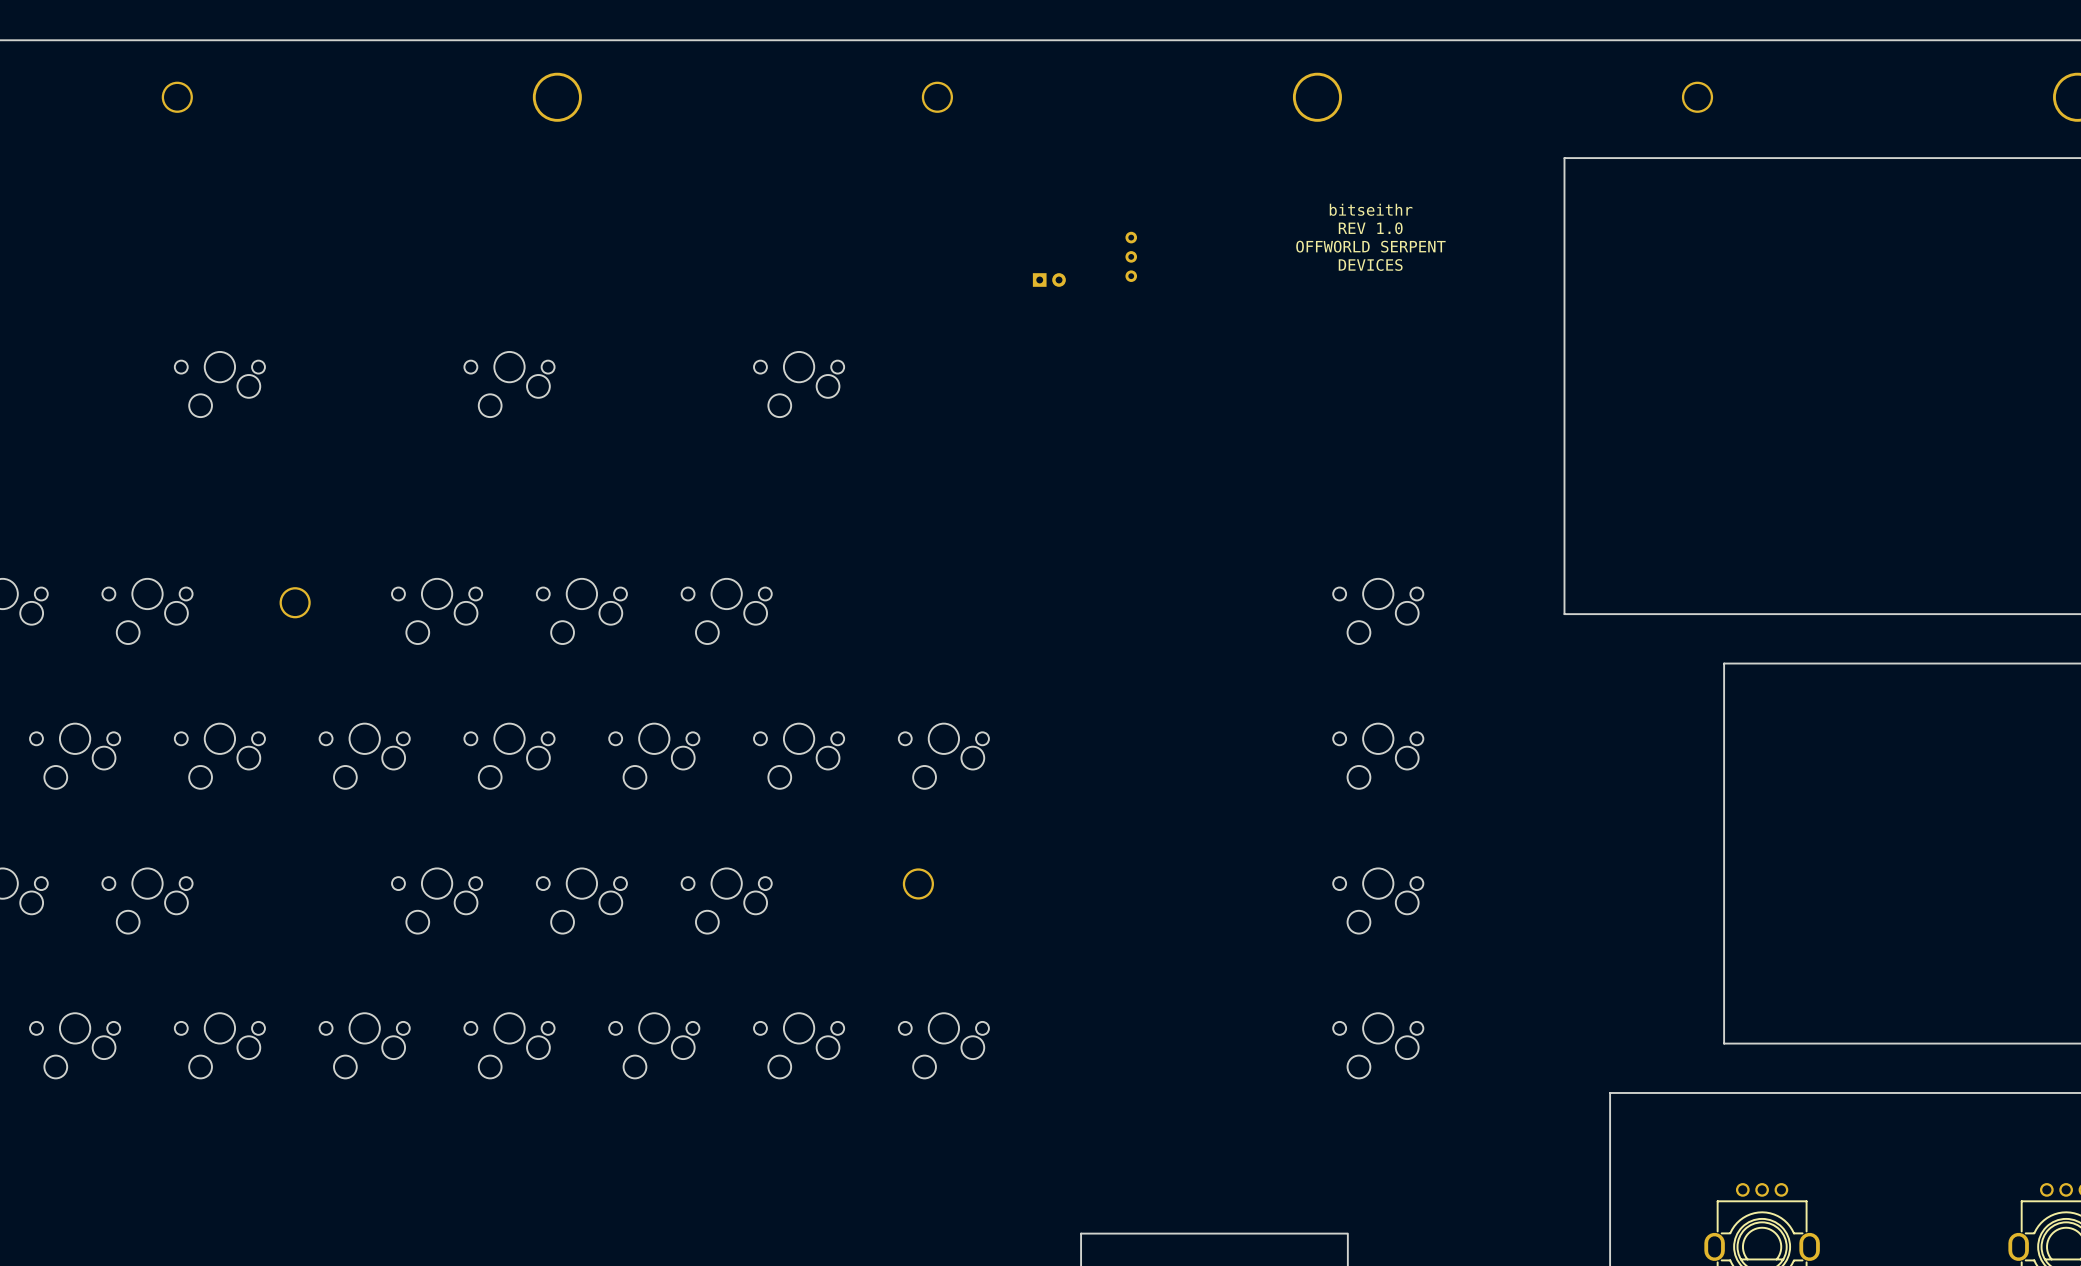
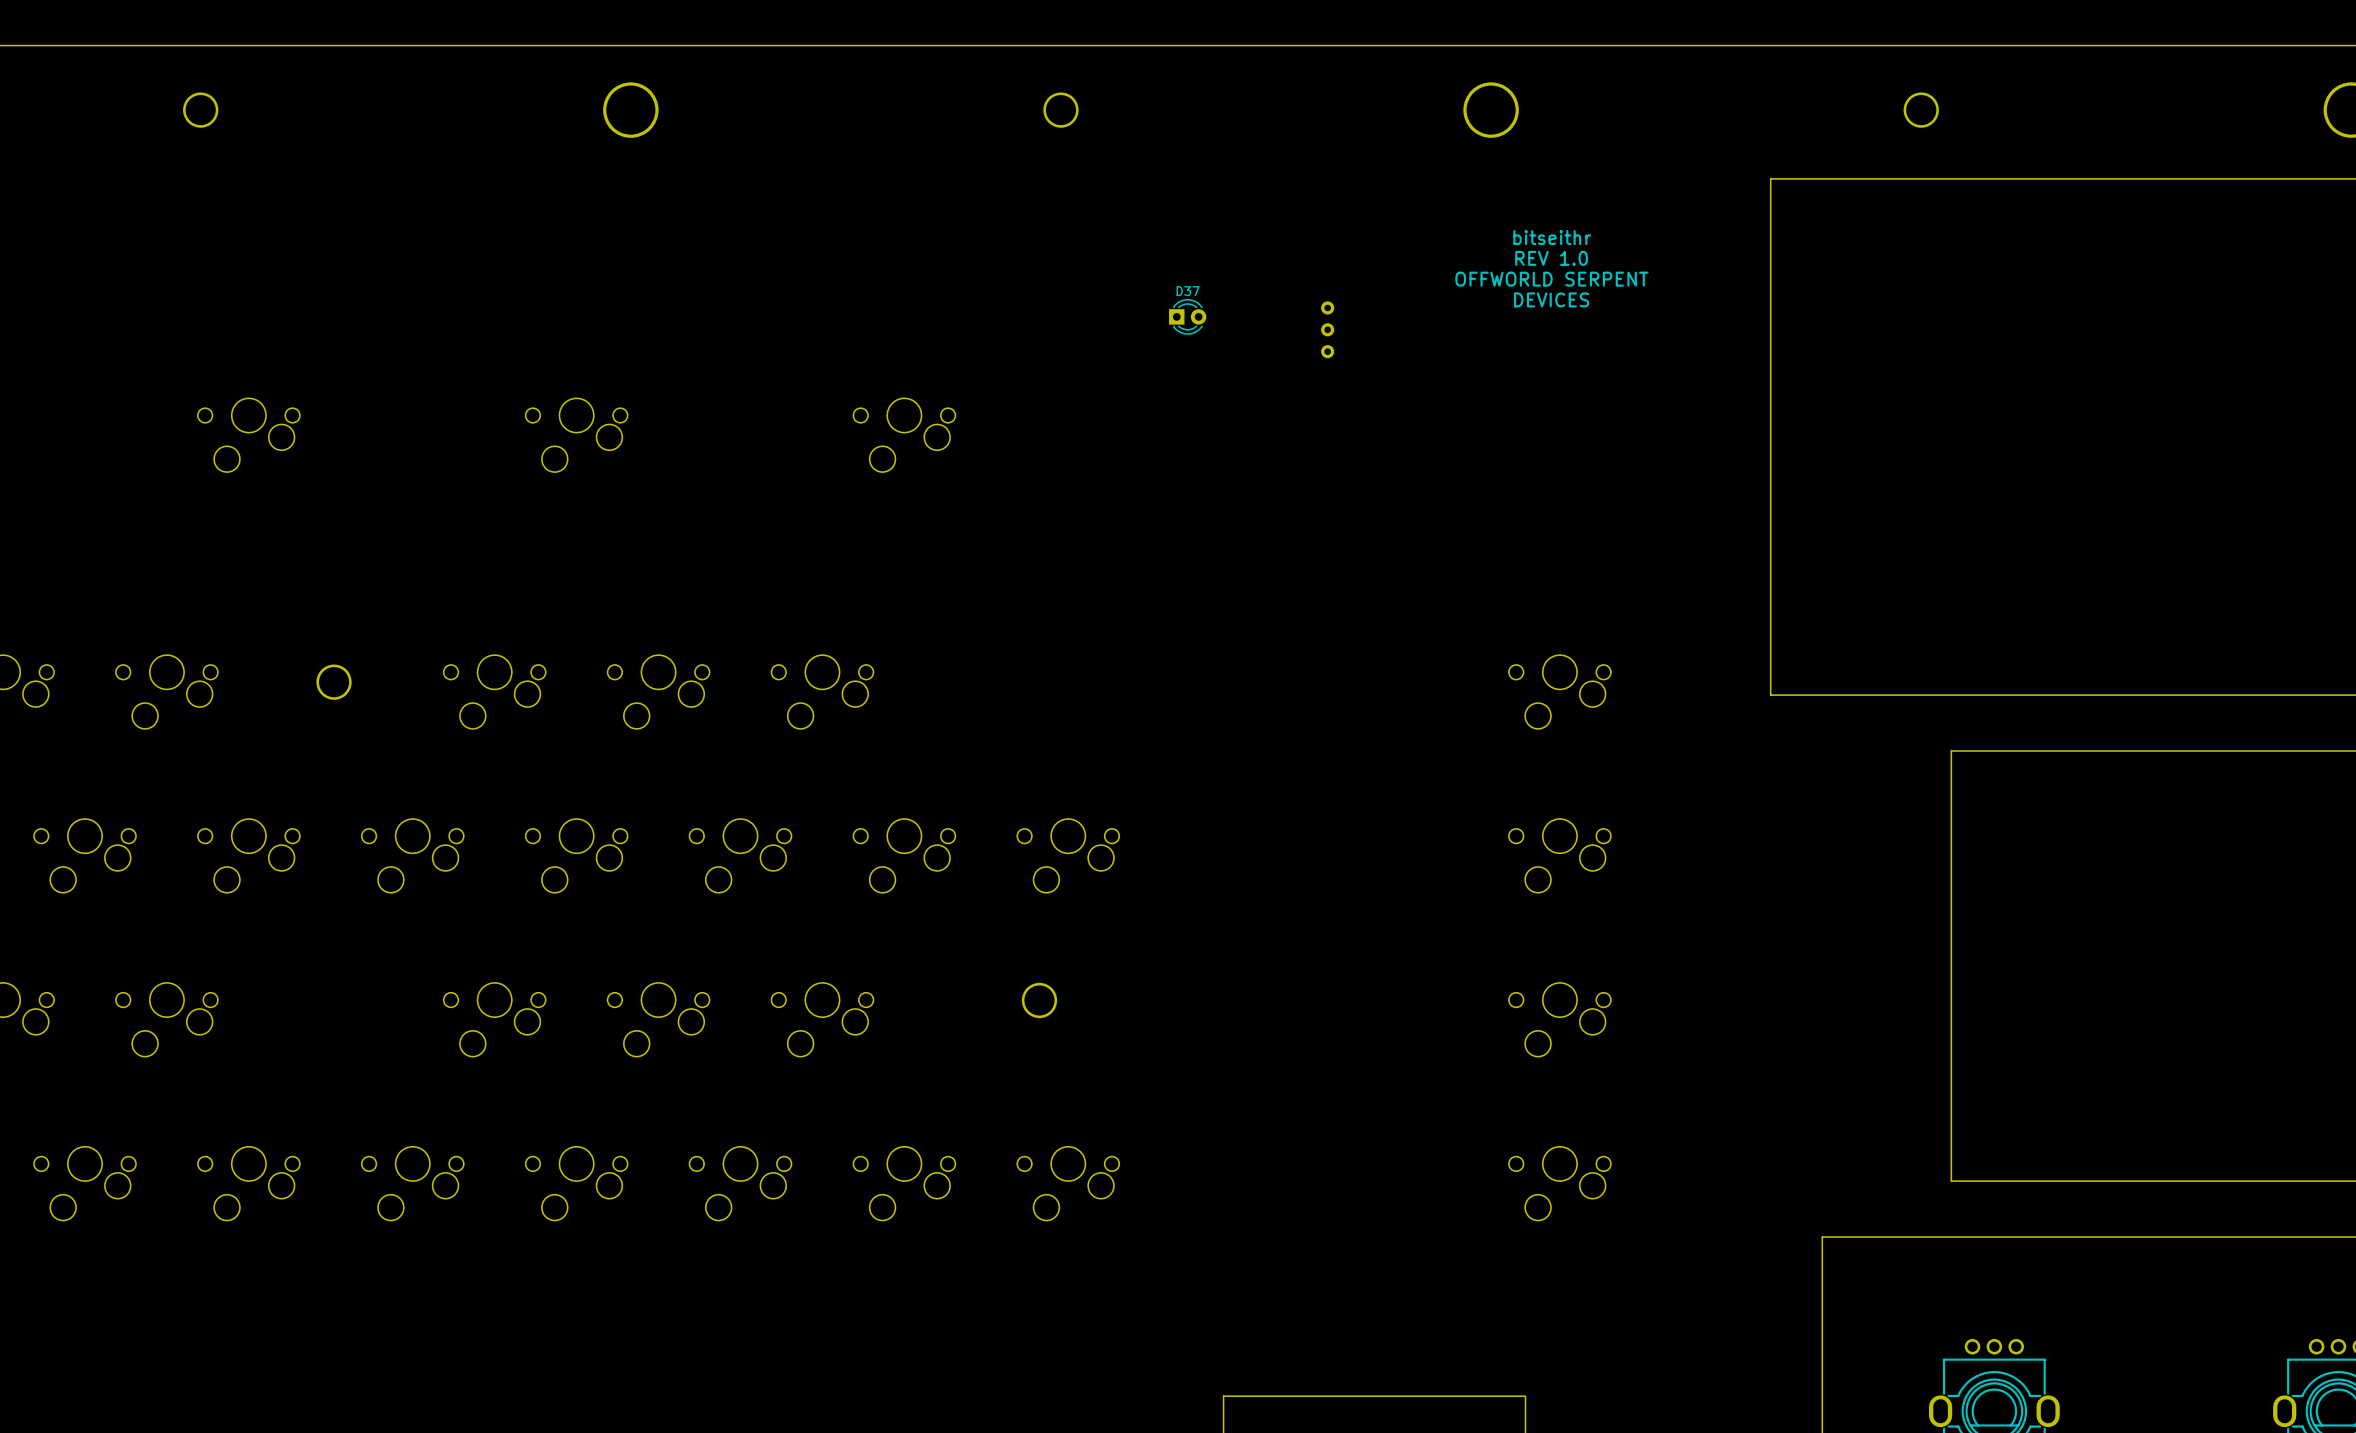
part position: (1131, 256) -> (1327, 329)
D37 side: bottom (1049, 279) -> top (1187, 316)

